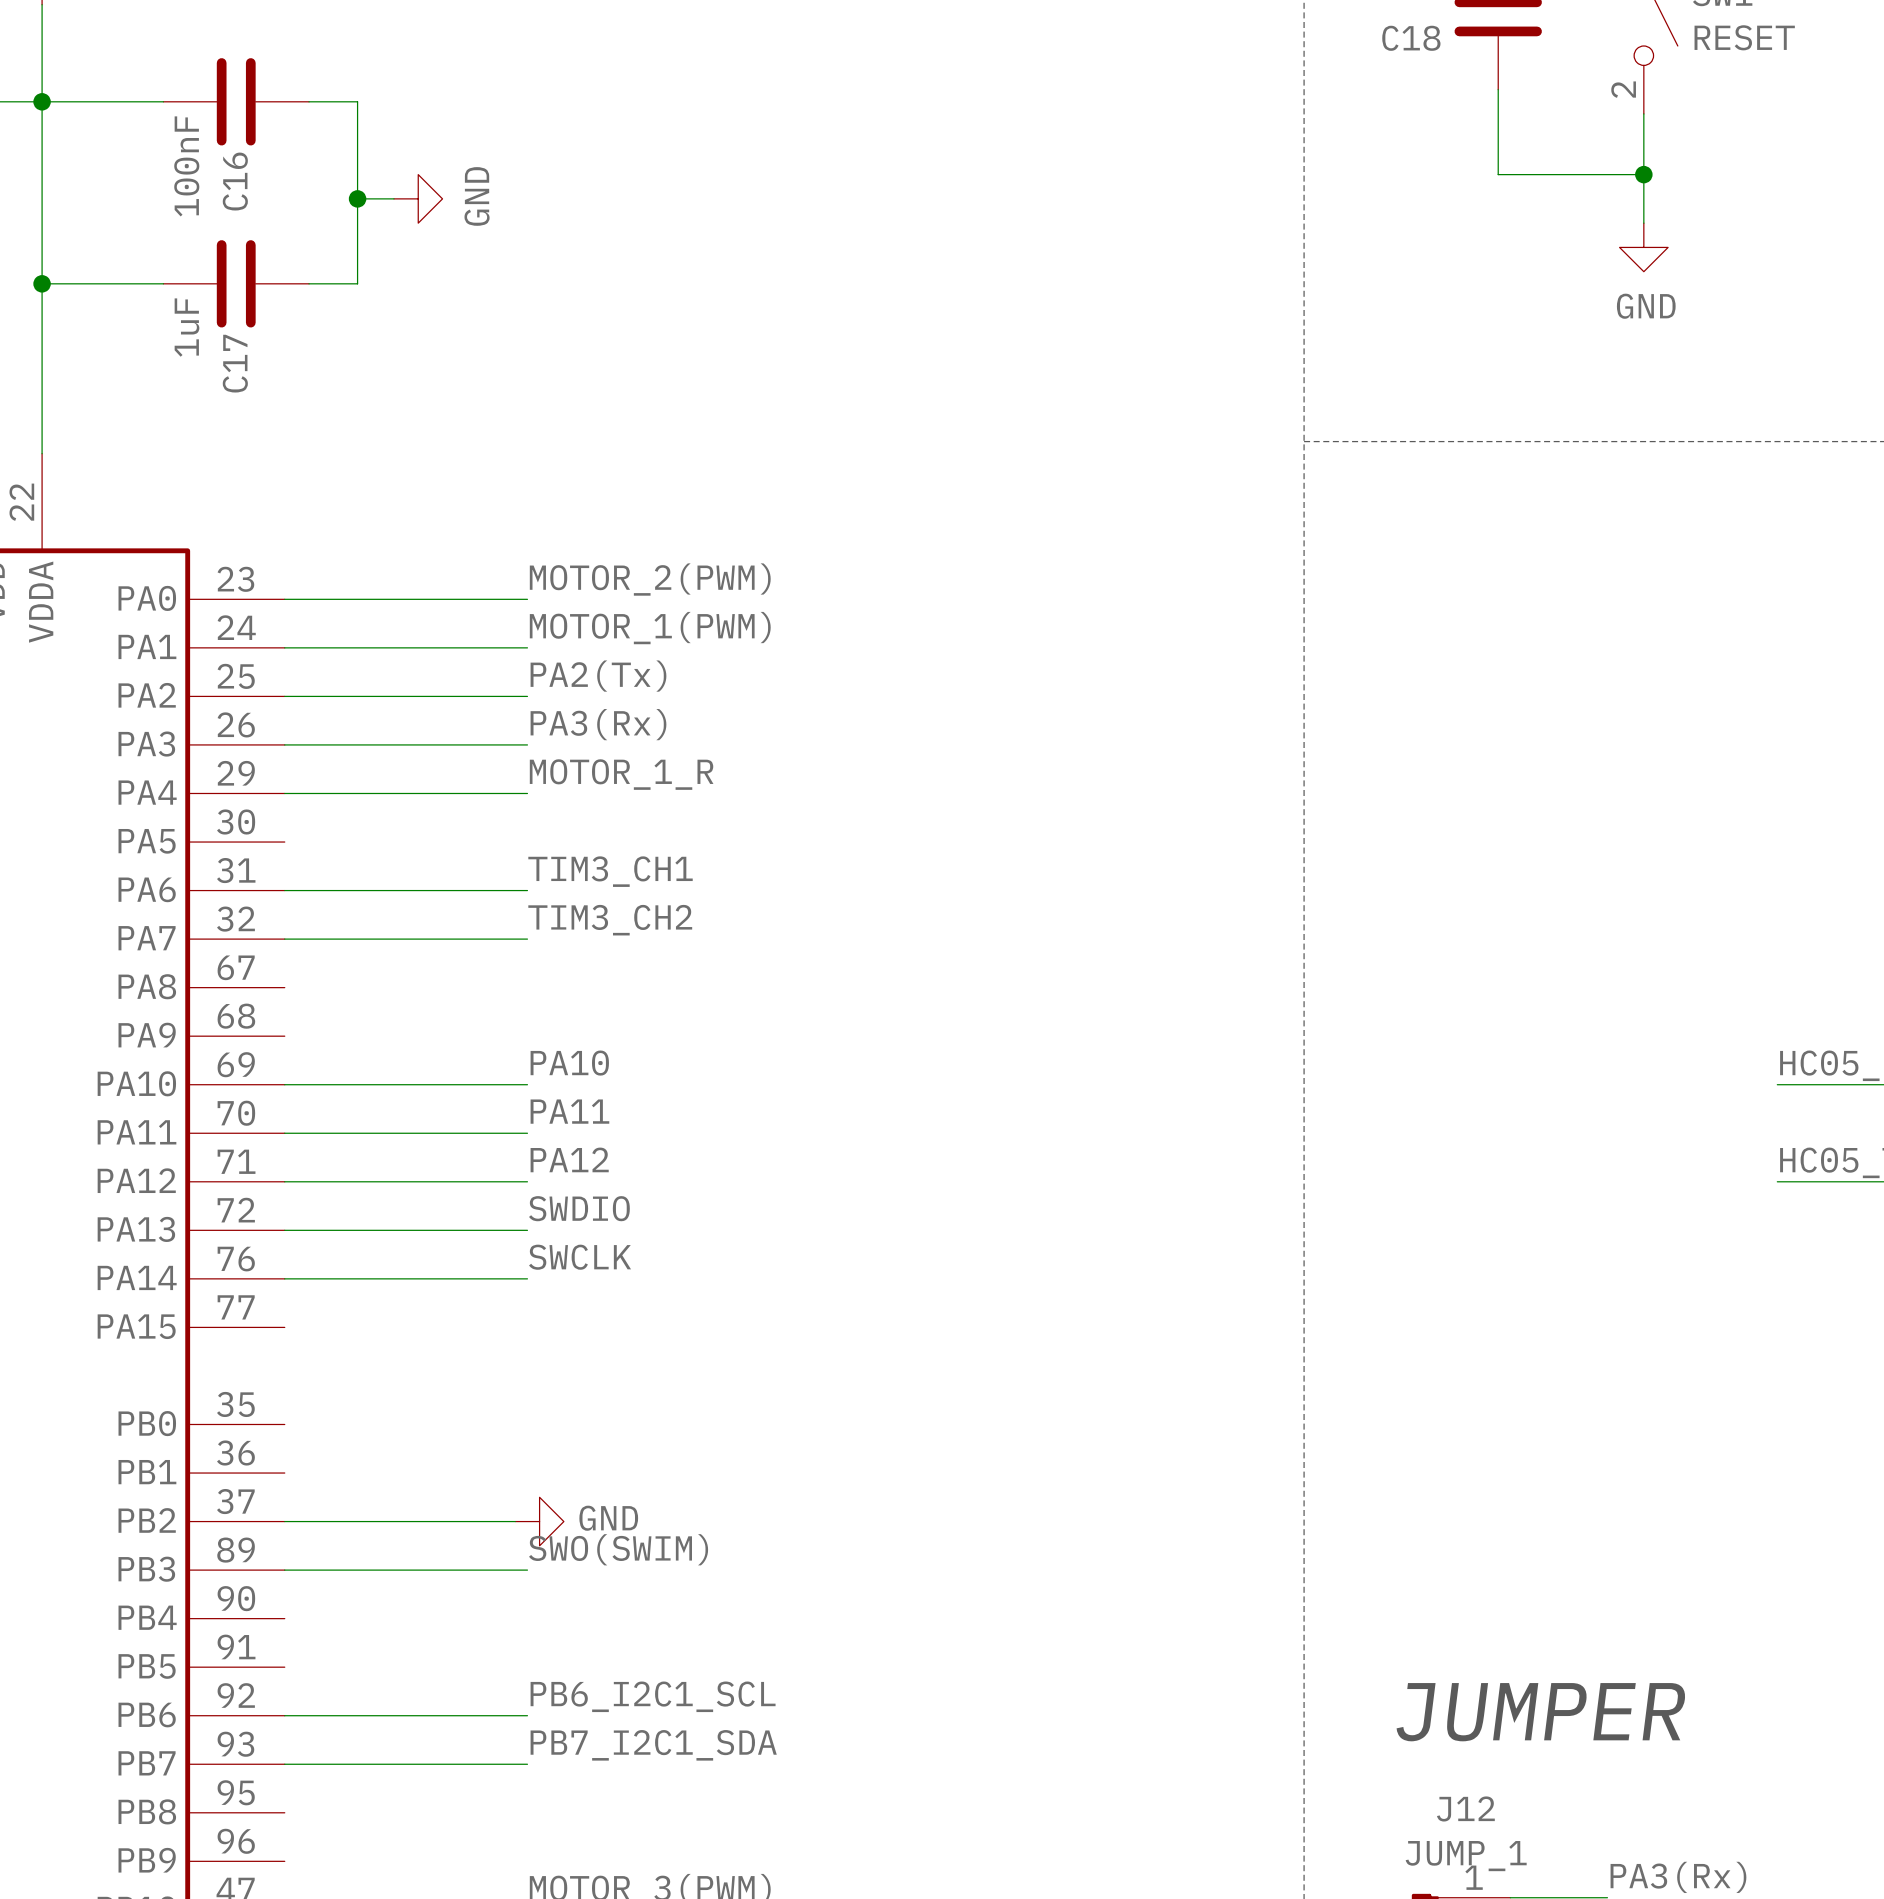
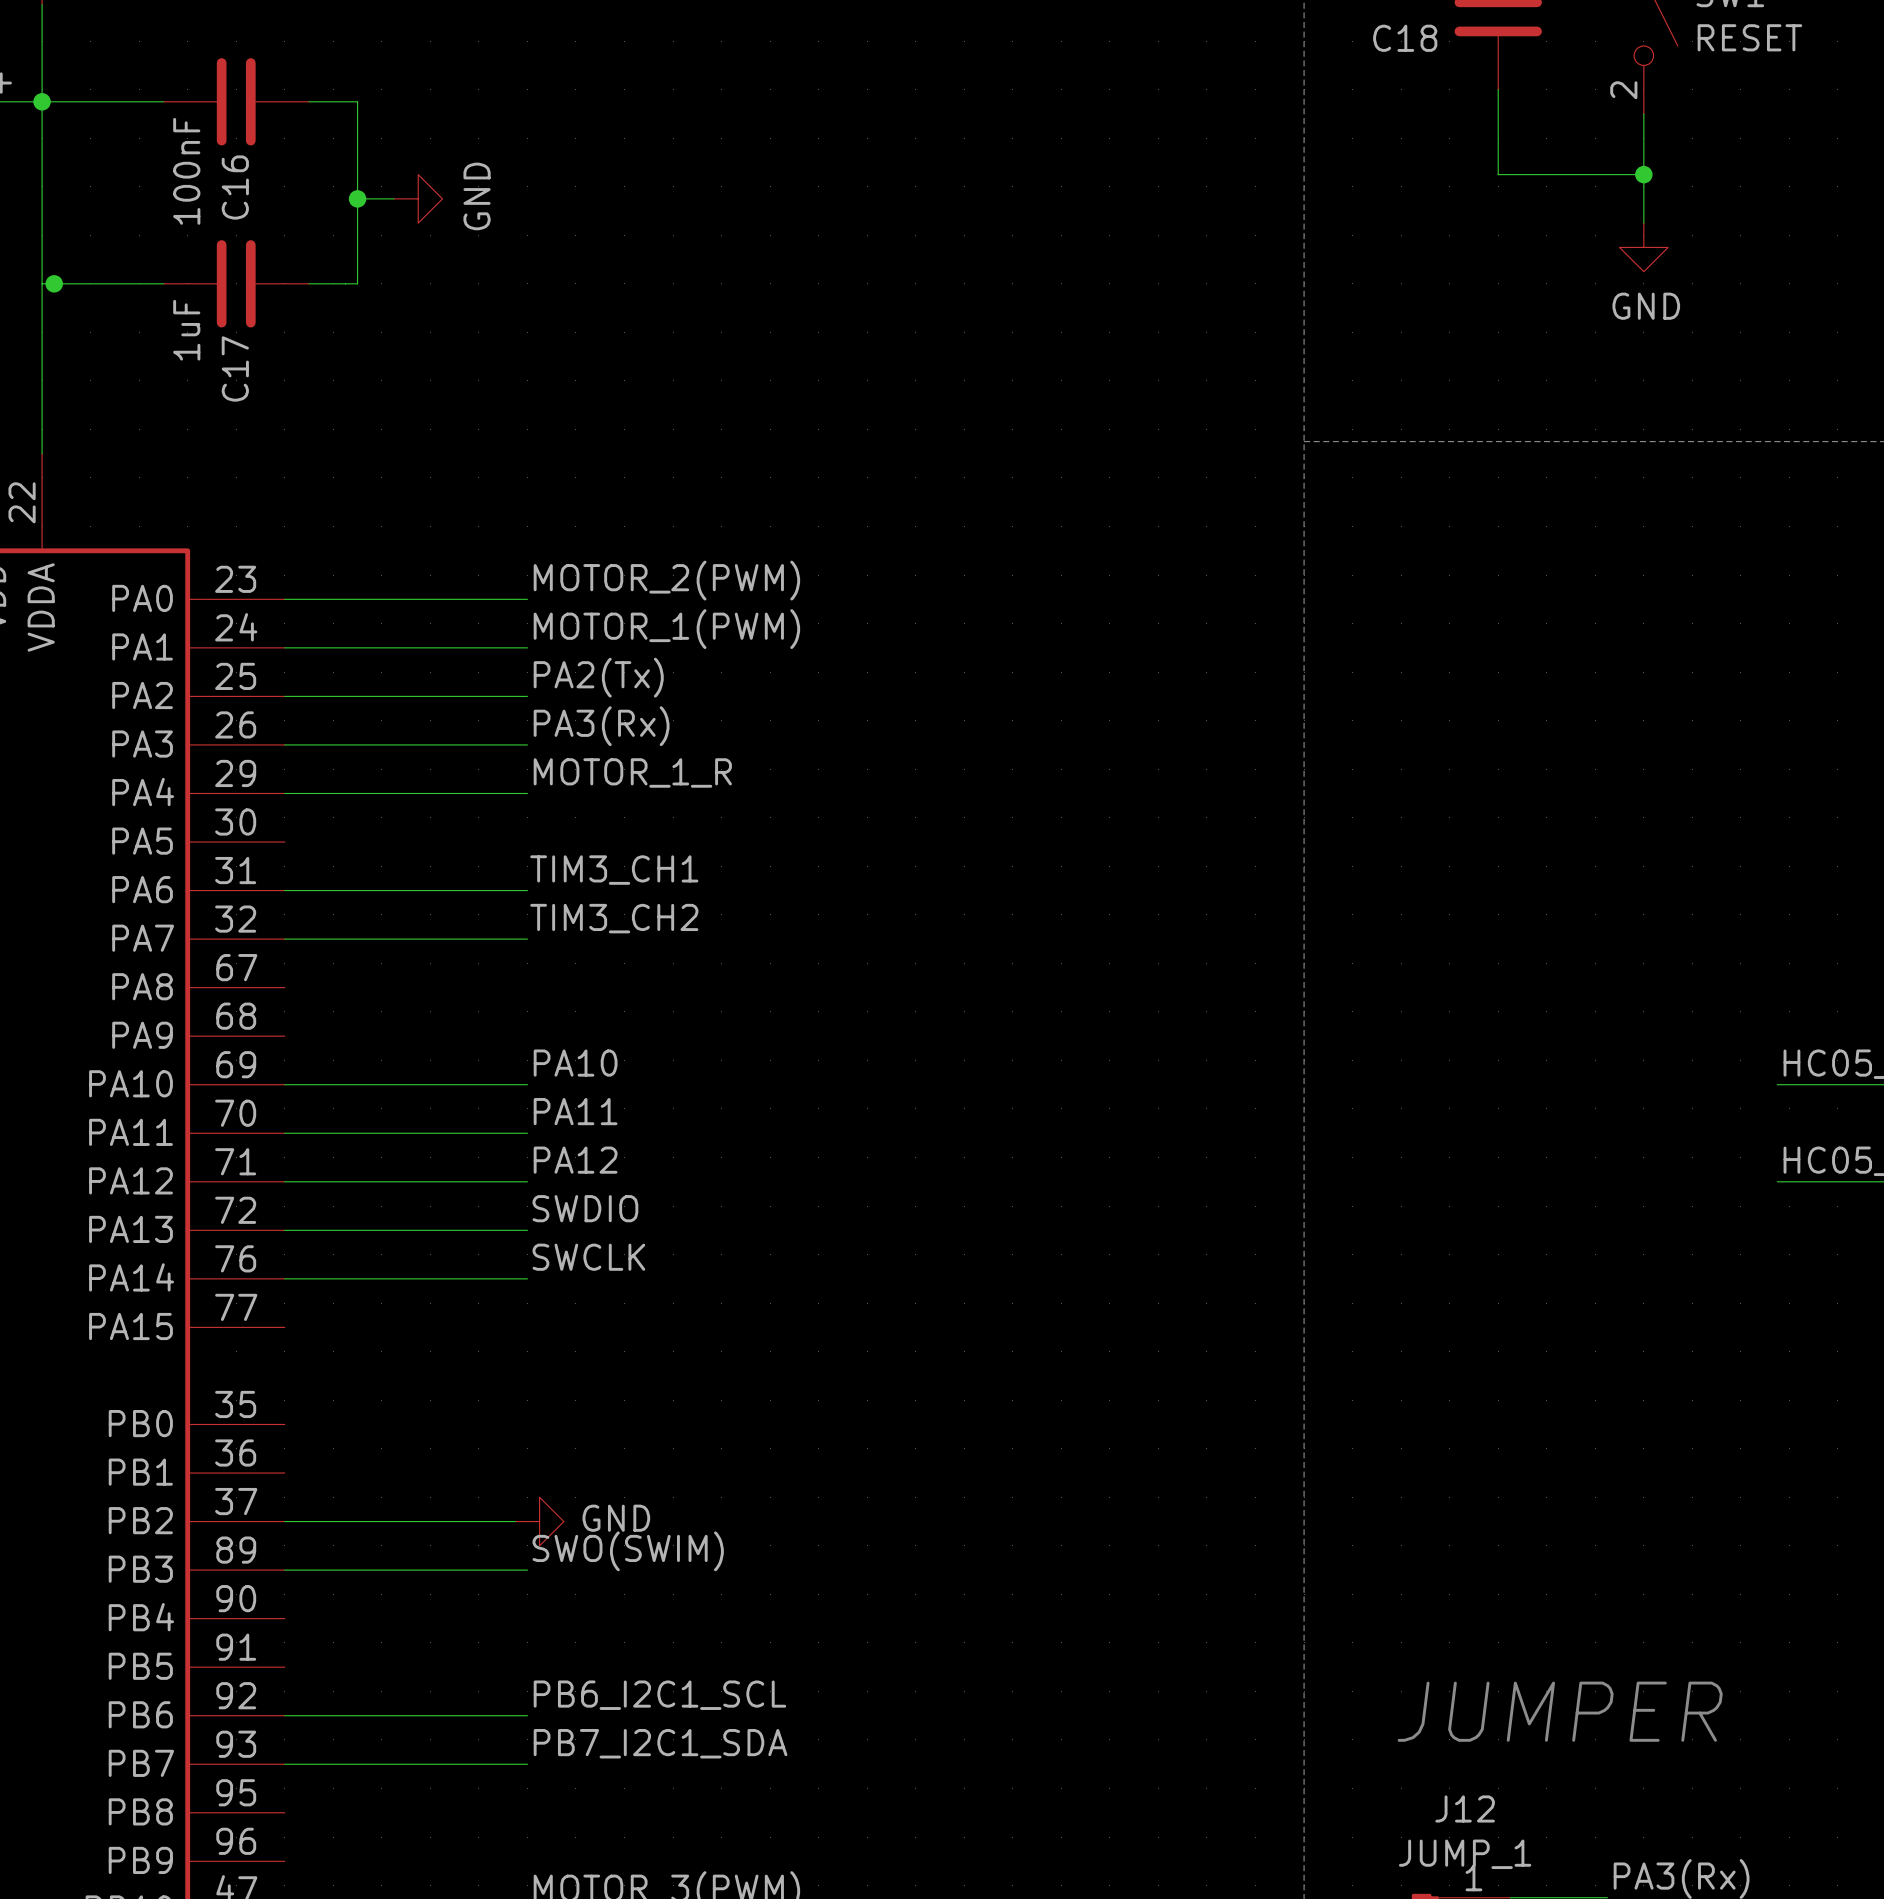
junction position: (42, 283) -> (54, 283)

